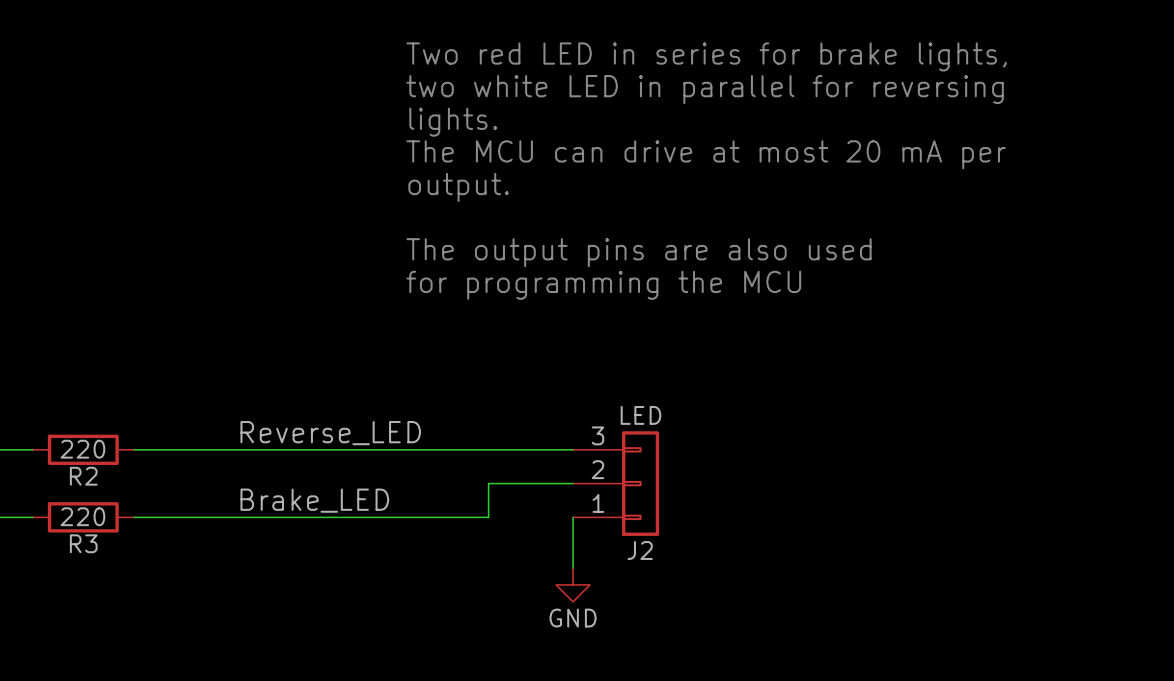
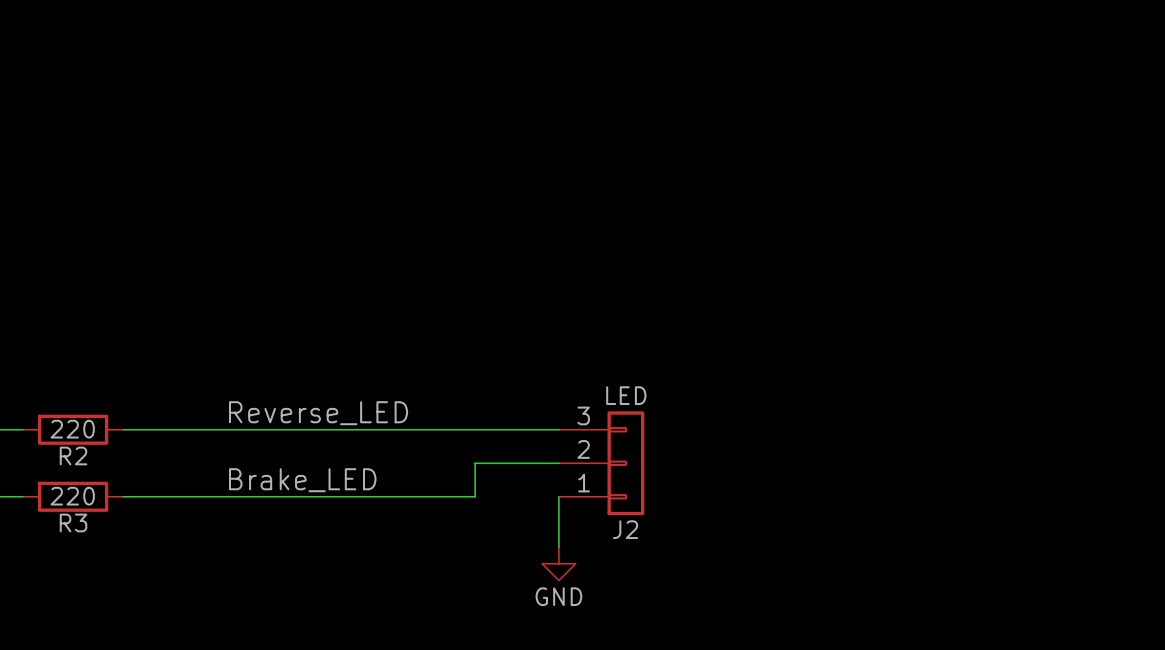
text: Two red LED in series for brake lights, (706, 56) -> none
text: two white LED in parallel for reversing (705, 89) -> none
text: lights. (453, 122) -> none
text: The MCU can drive at most 20 mA per (706, 154) -> none
text: output. (458, 187) -> none
text: The output pins are also used (639, 252) -> none
text: for programming the MCU (603, 285) -> none

